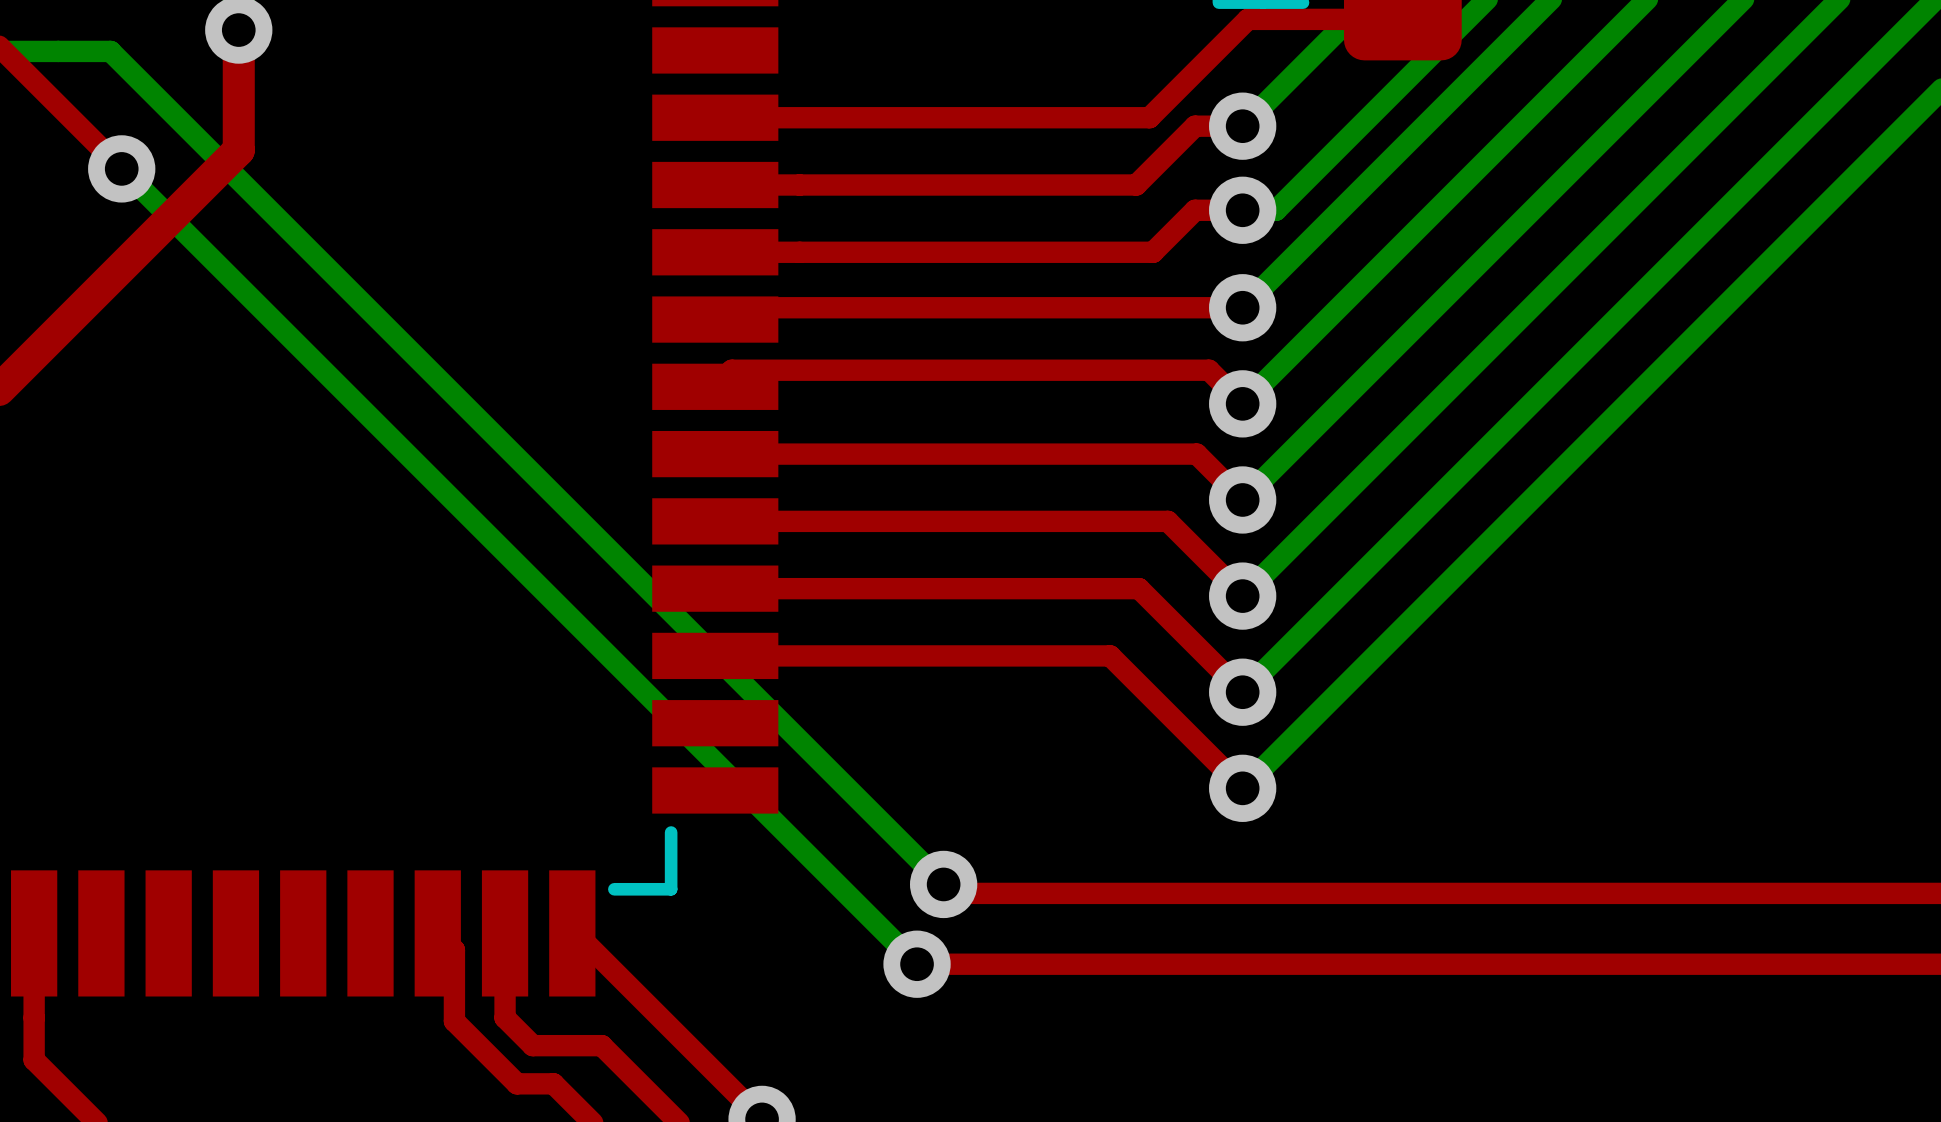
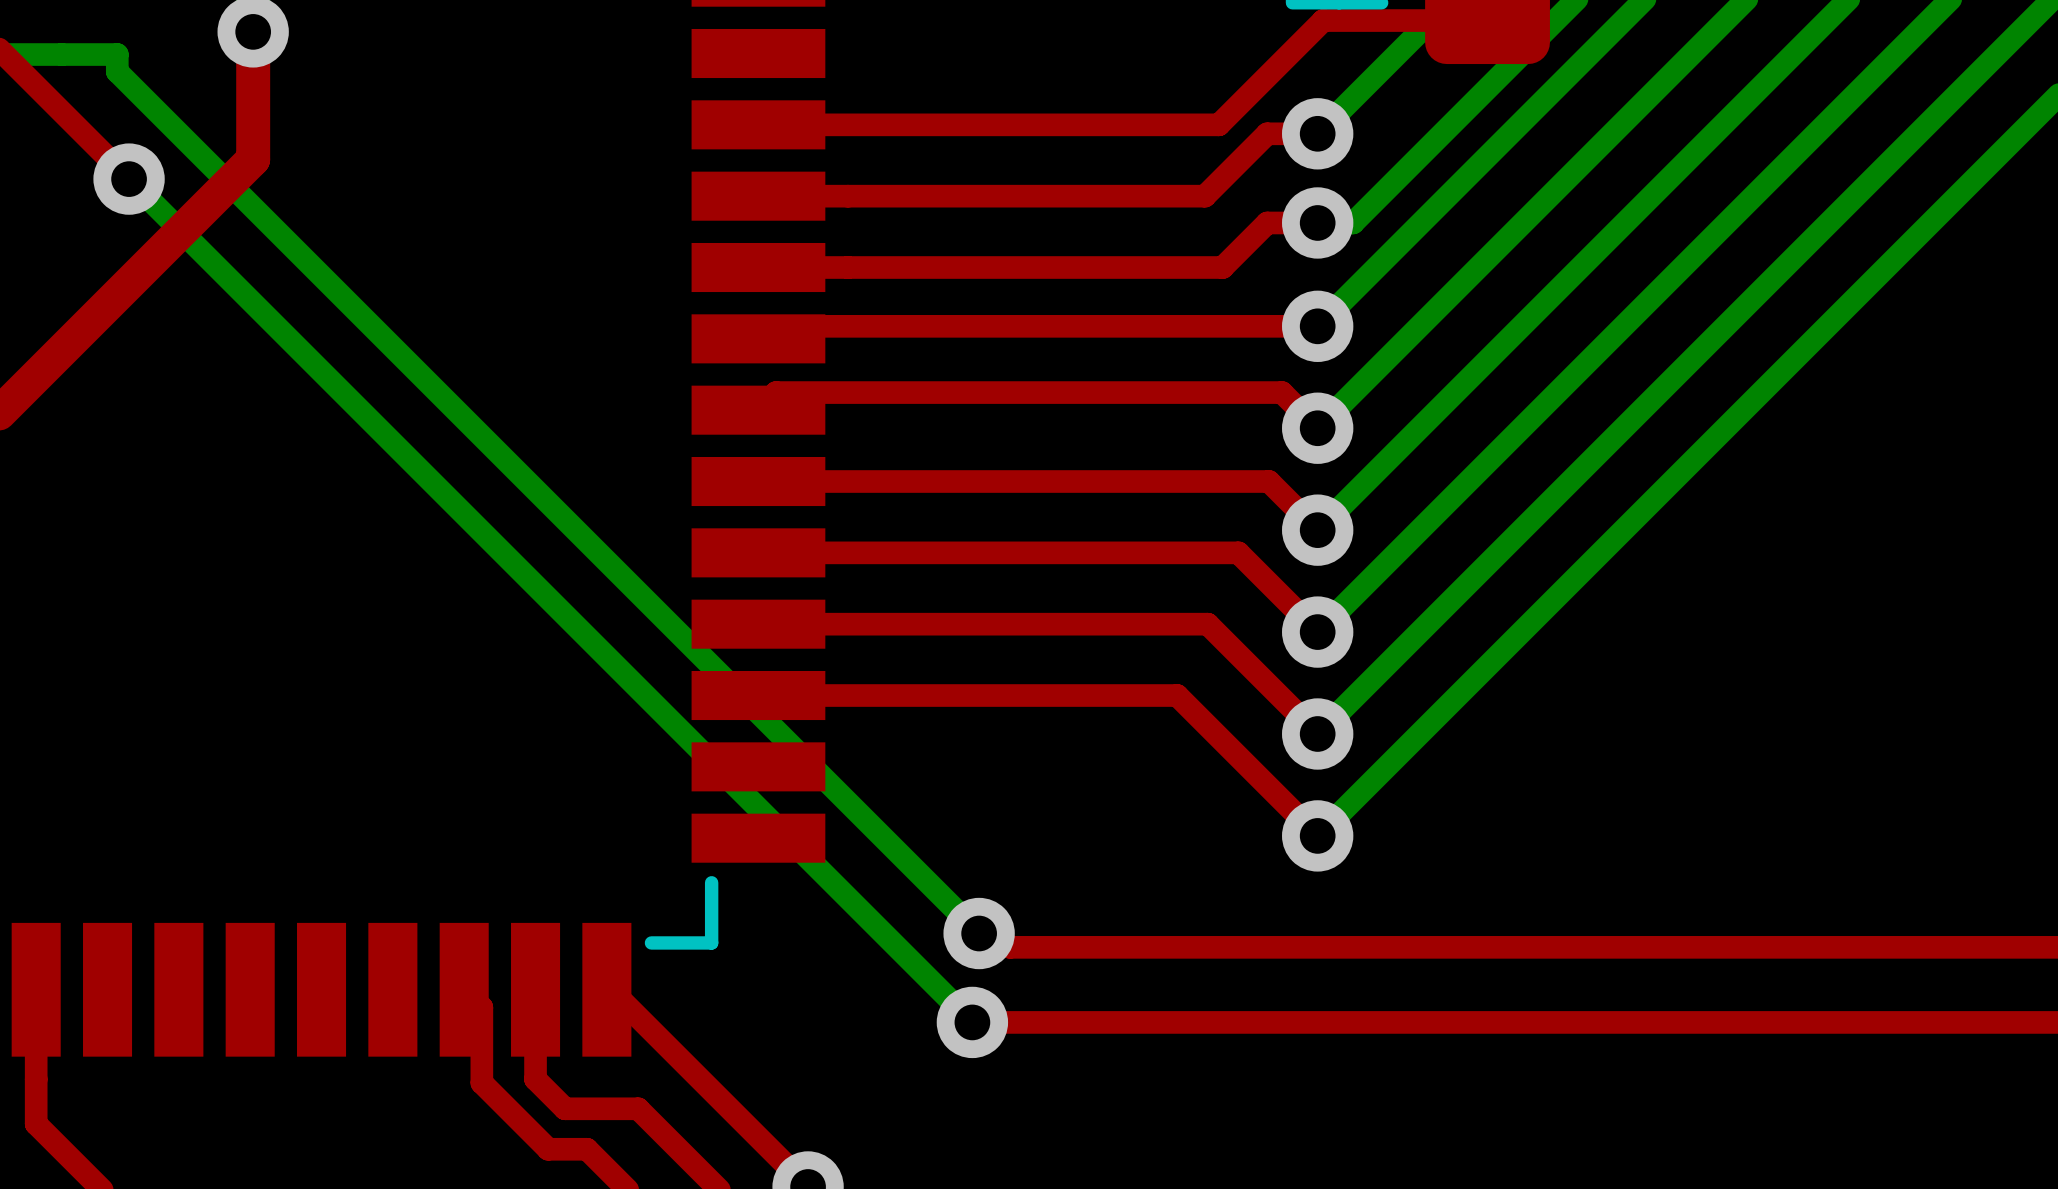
bottom track: (110, 51) (943, 884) -> (117, 54) (117, 71) (979, 933)
via position: (943, 884) -> (979, 933)

